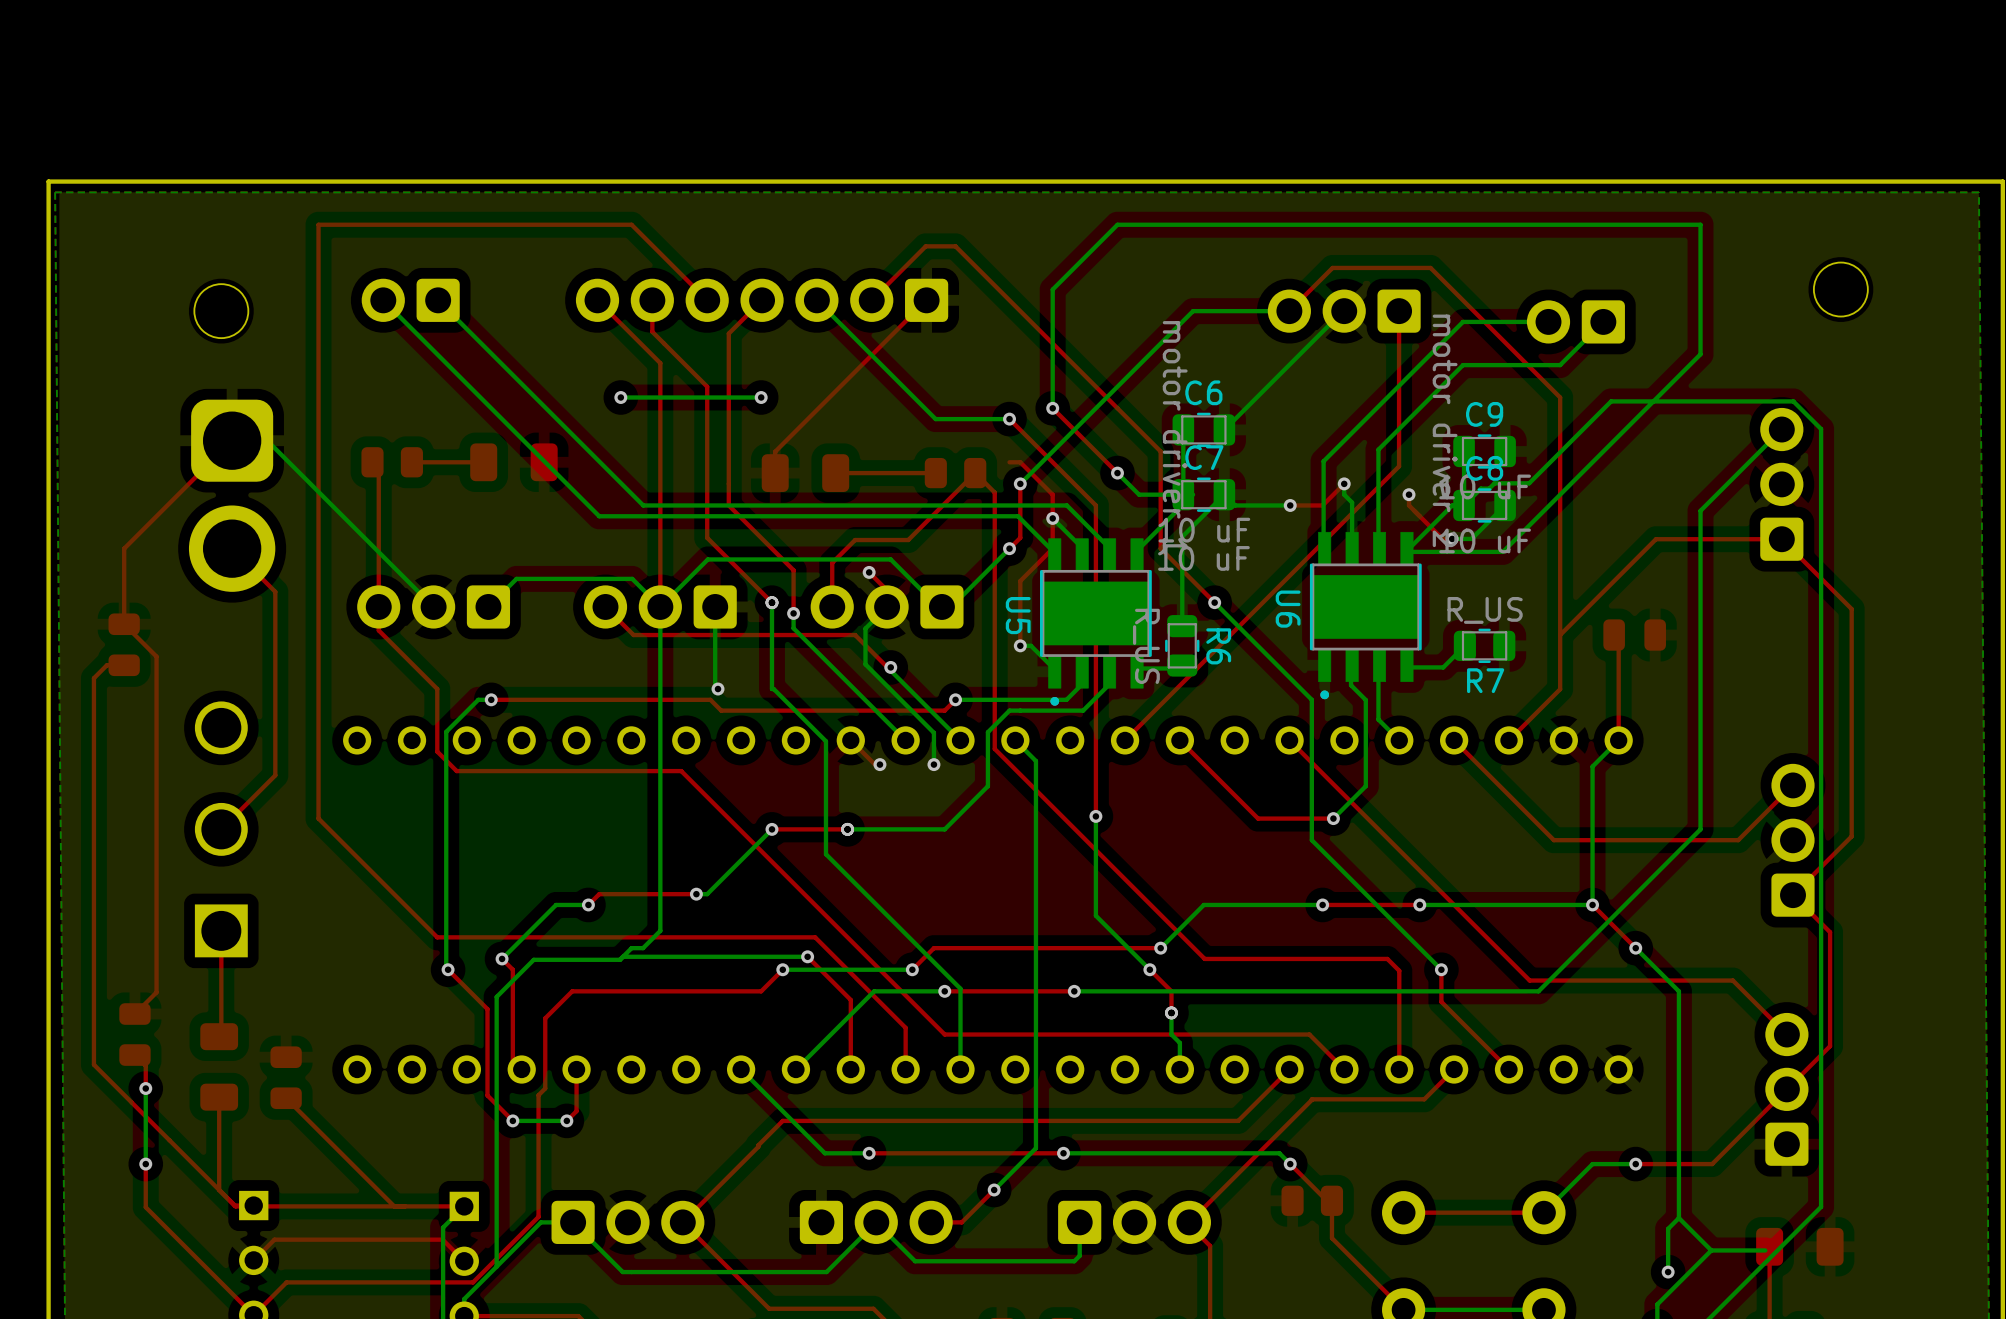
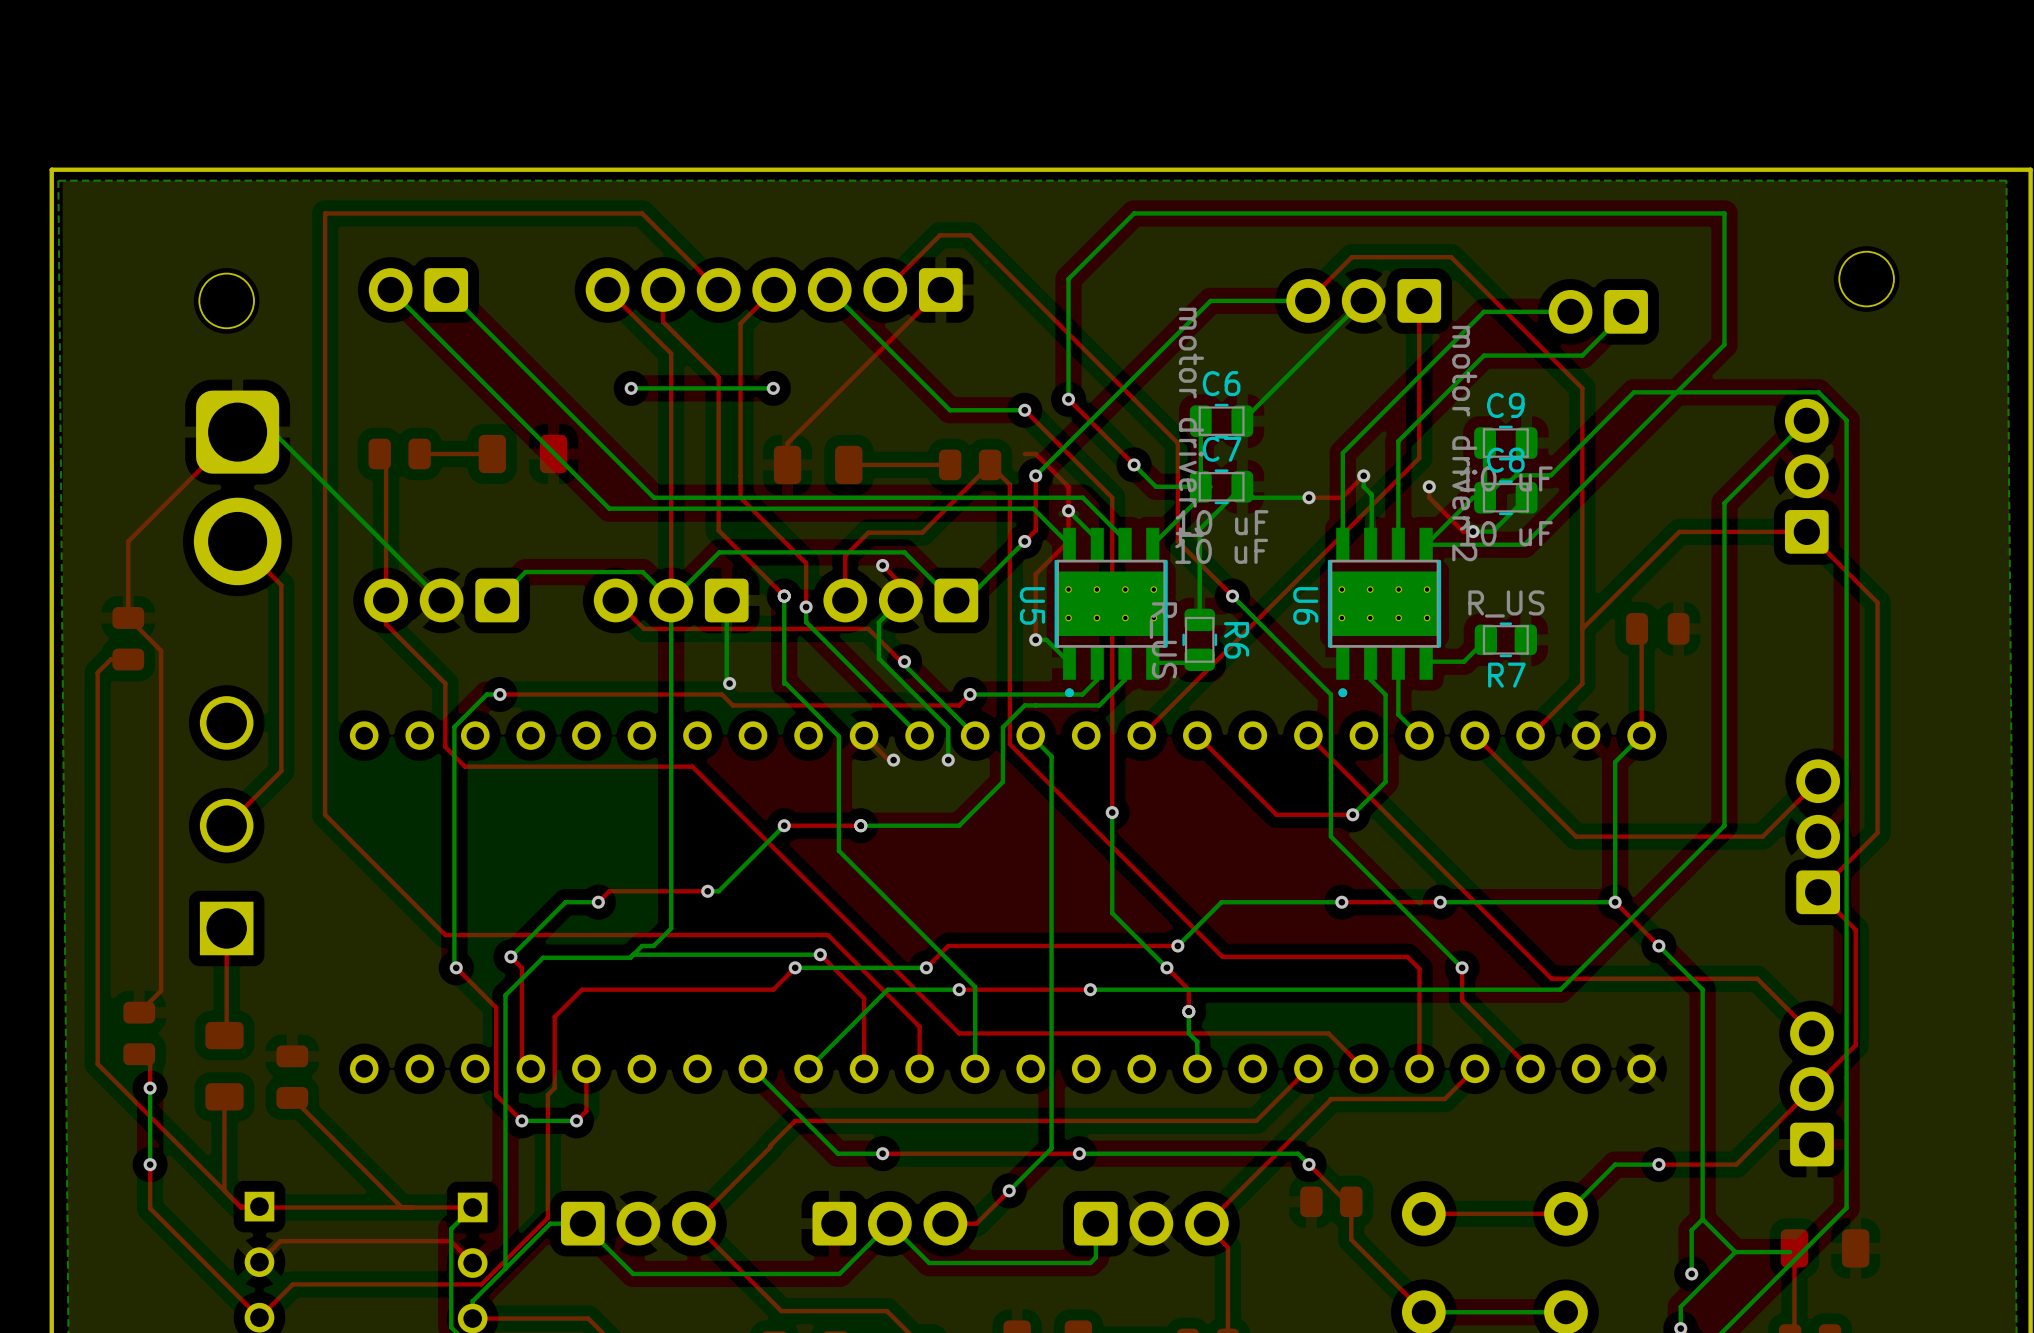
U6 footprint: [1309, 531, 1422, 700] -> [1327, 527, 1442, 698]
U5 footprint: [1040, 538, 1152, 706] -> [1054, 527, 1168, 698]

